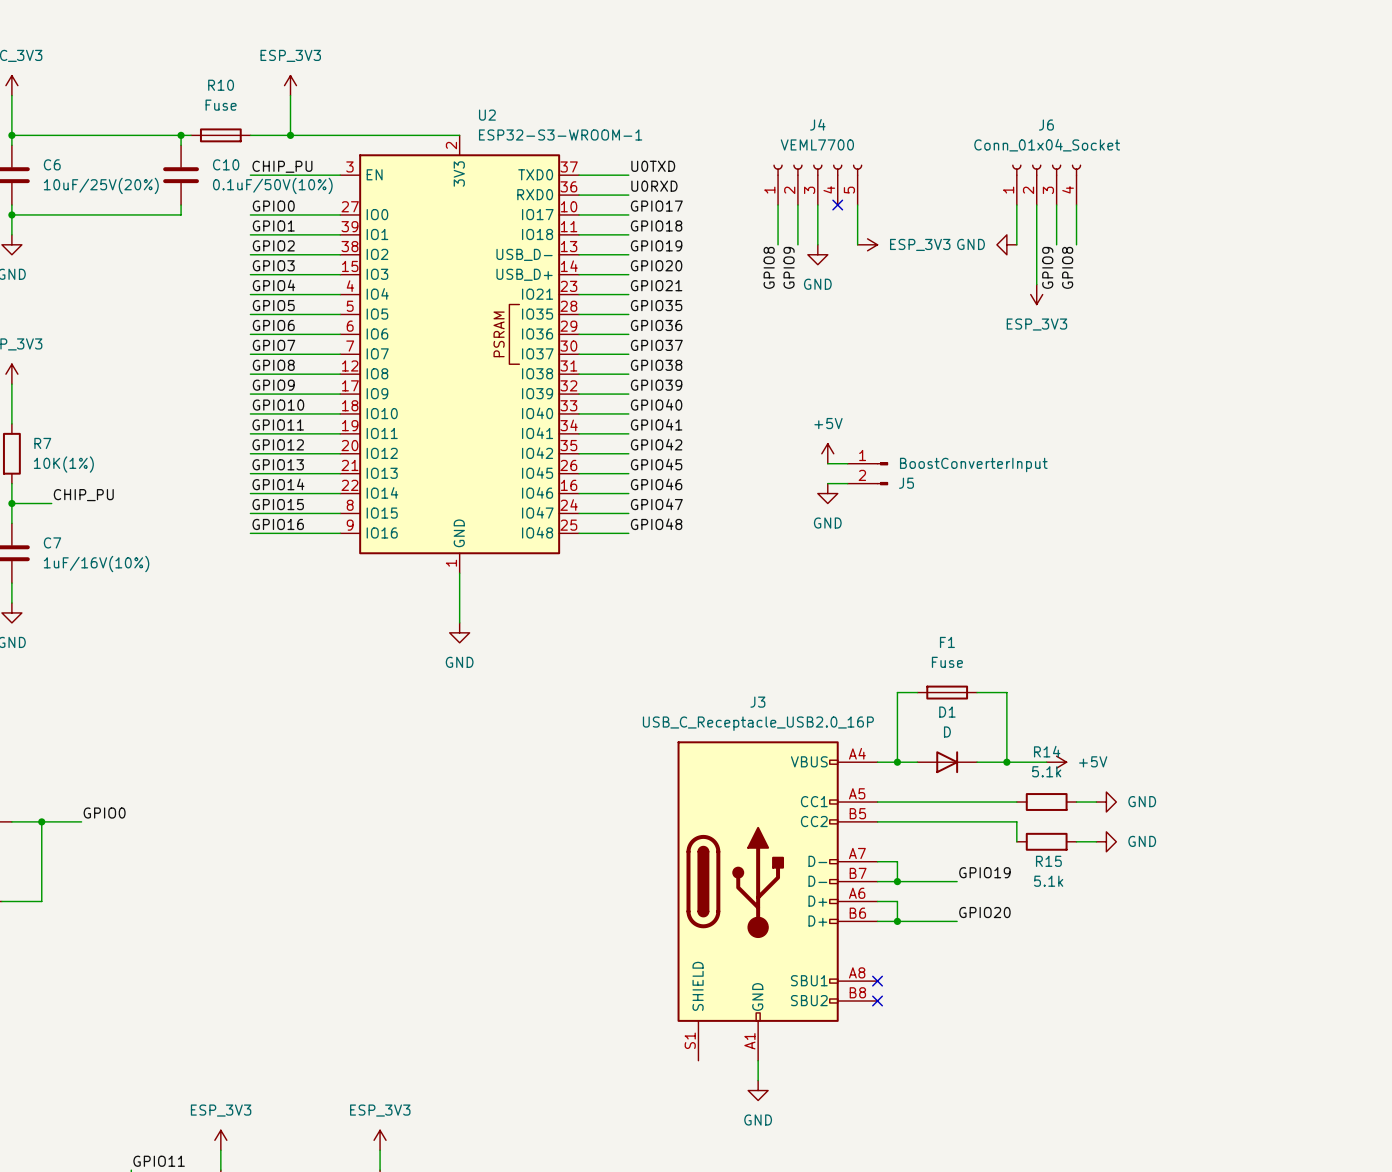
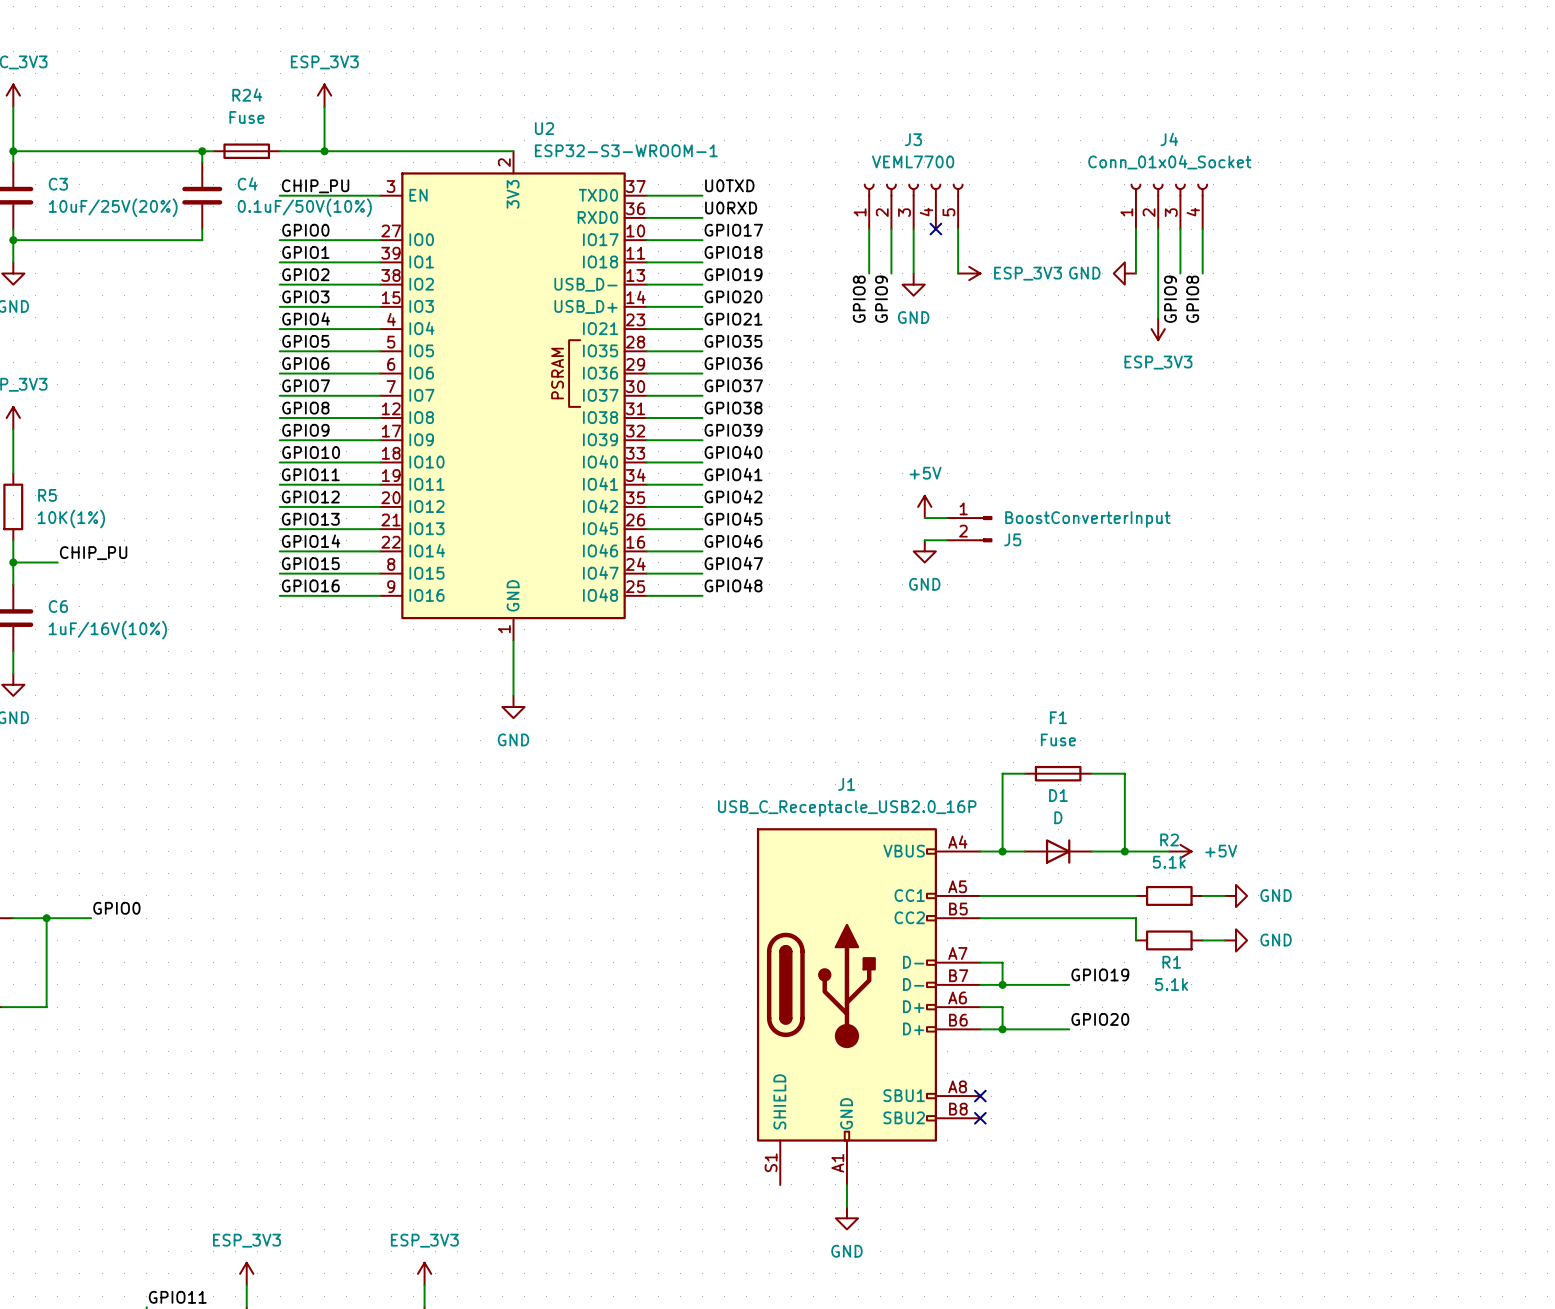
R10 name: R10 (221, 85) -> R24 (247, 94)
J4 name: J4 (817, 124) -> J3 (913, 139)
J6 name: J6 (1046, 125) -> J4 (1169, 139)
C6 name: C6 (52, 164) -> C3 (58, 184)
C10 name: C10 (226, 164) -> C4 (247, 183)
R7 name: R7 (42, 443) -> R5 (47, 495)
C7 name: C7 (52, 542) -> C6 (58, 606)
J3 name: J3 (757, 702) -> J1 (846, 784)
R14 name: R14 (1047, 751) -> R2 (1169, 839)
R15 name: R15 (1048, 861) -> R1 (1171, 962)

